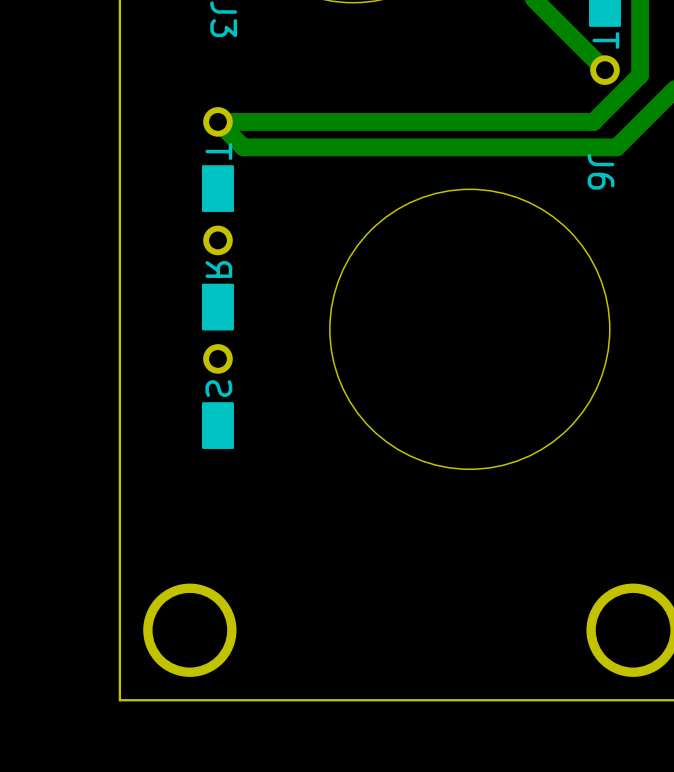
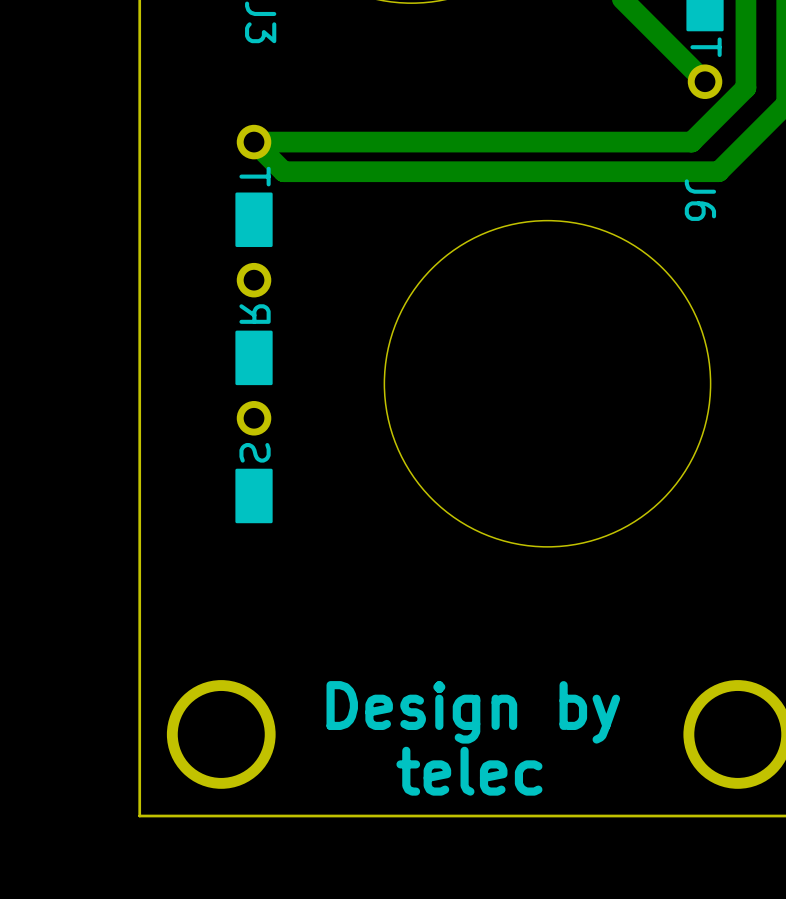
text: none -> Design by (473, 712)
text: none -> telec (469, 771)

